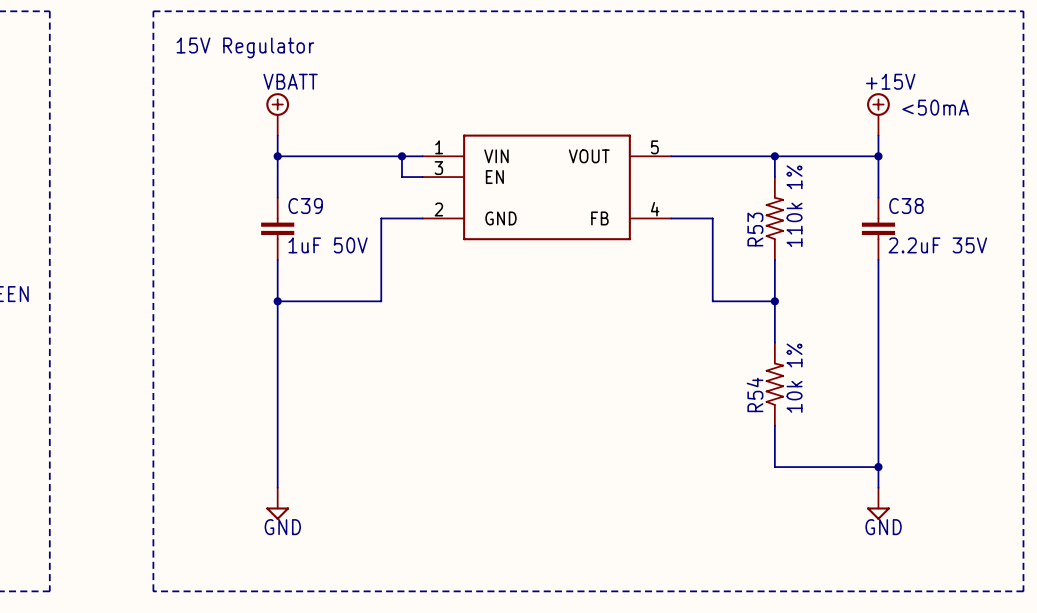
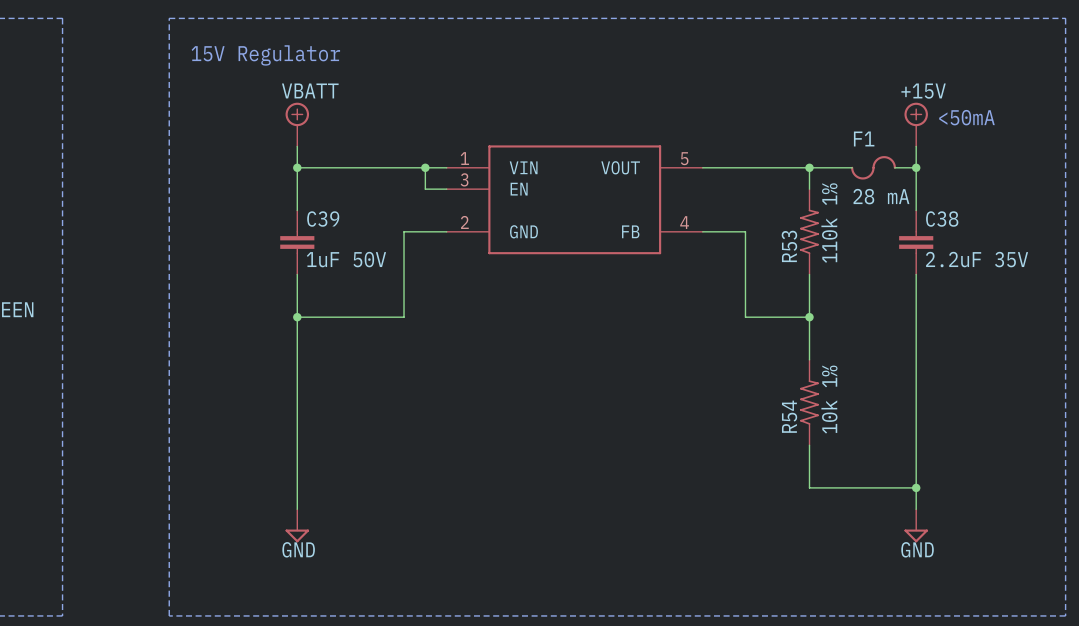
wire: (816, 156) (857, 156) -> none
F1: none -> 28 mA (873, 167)

